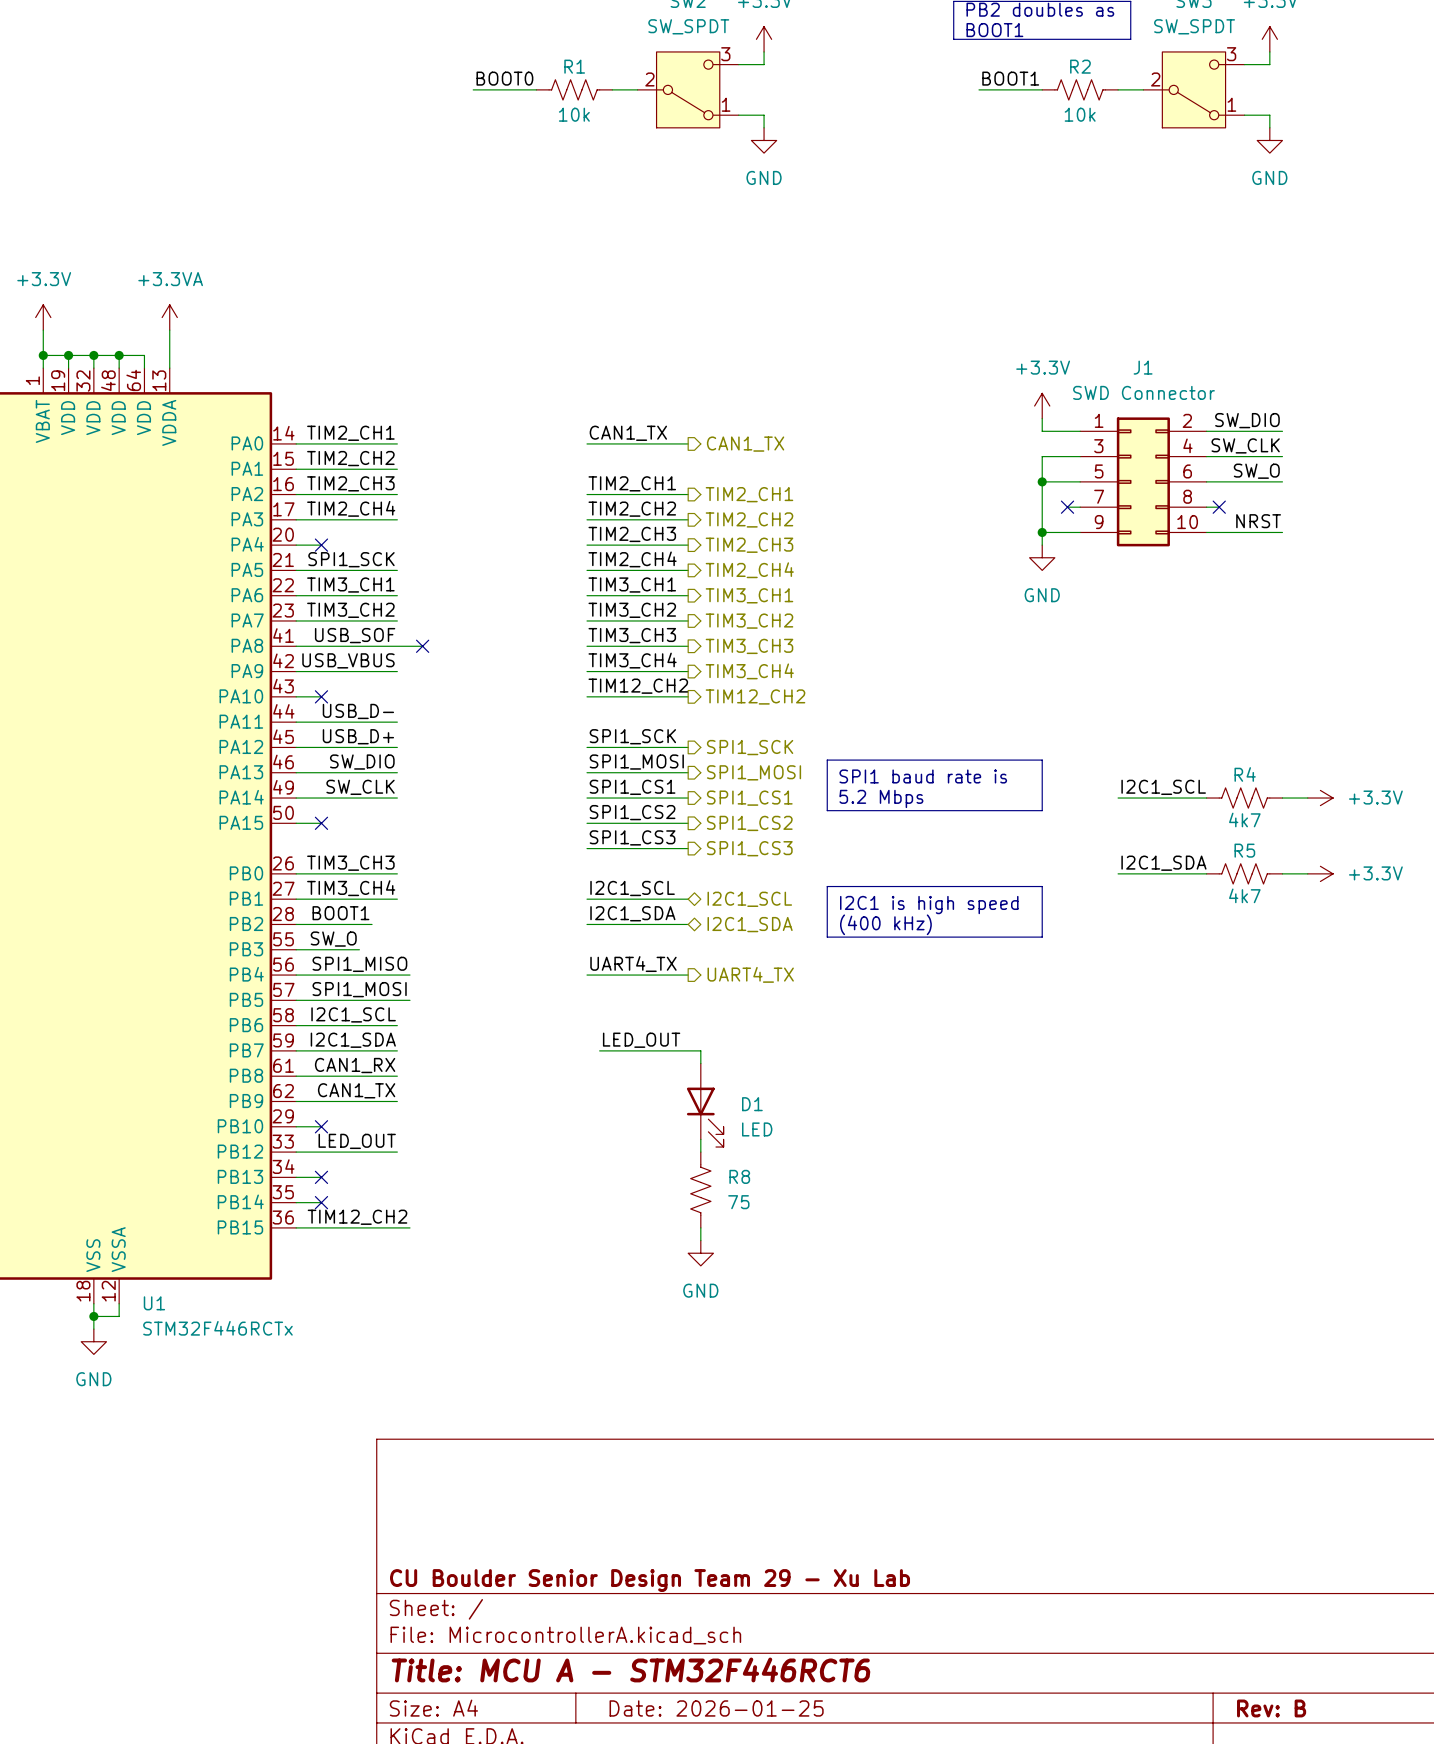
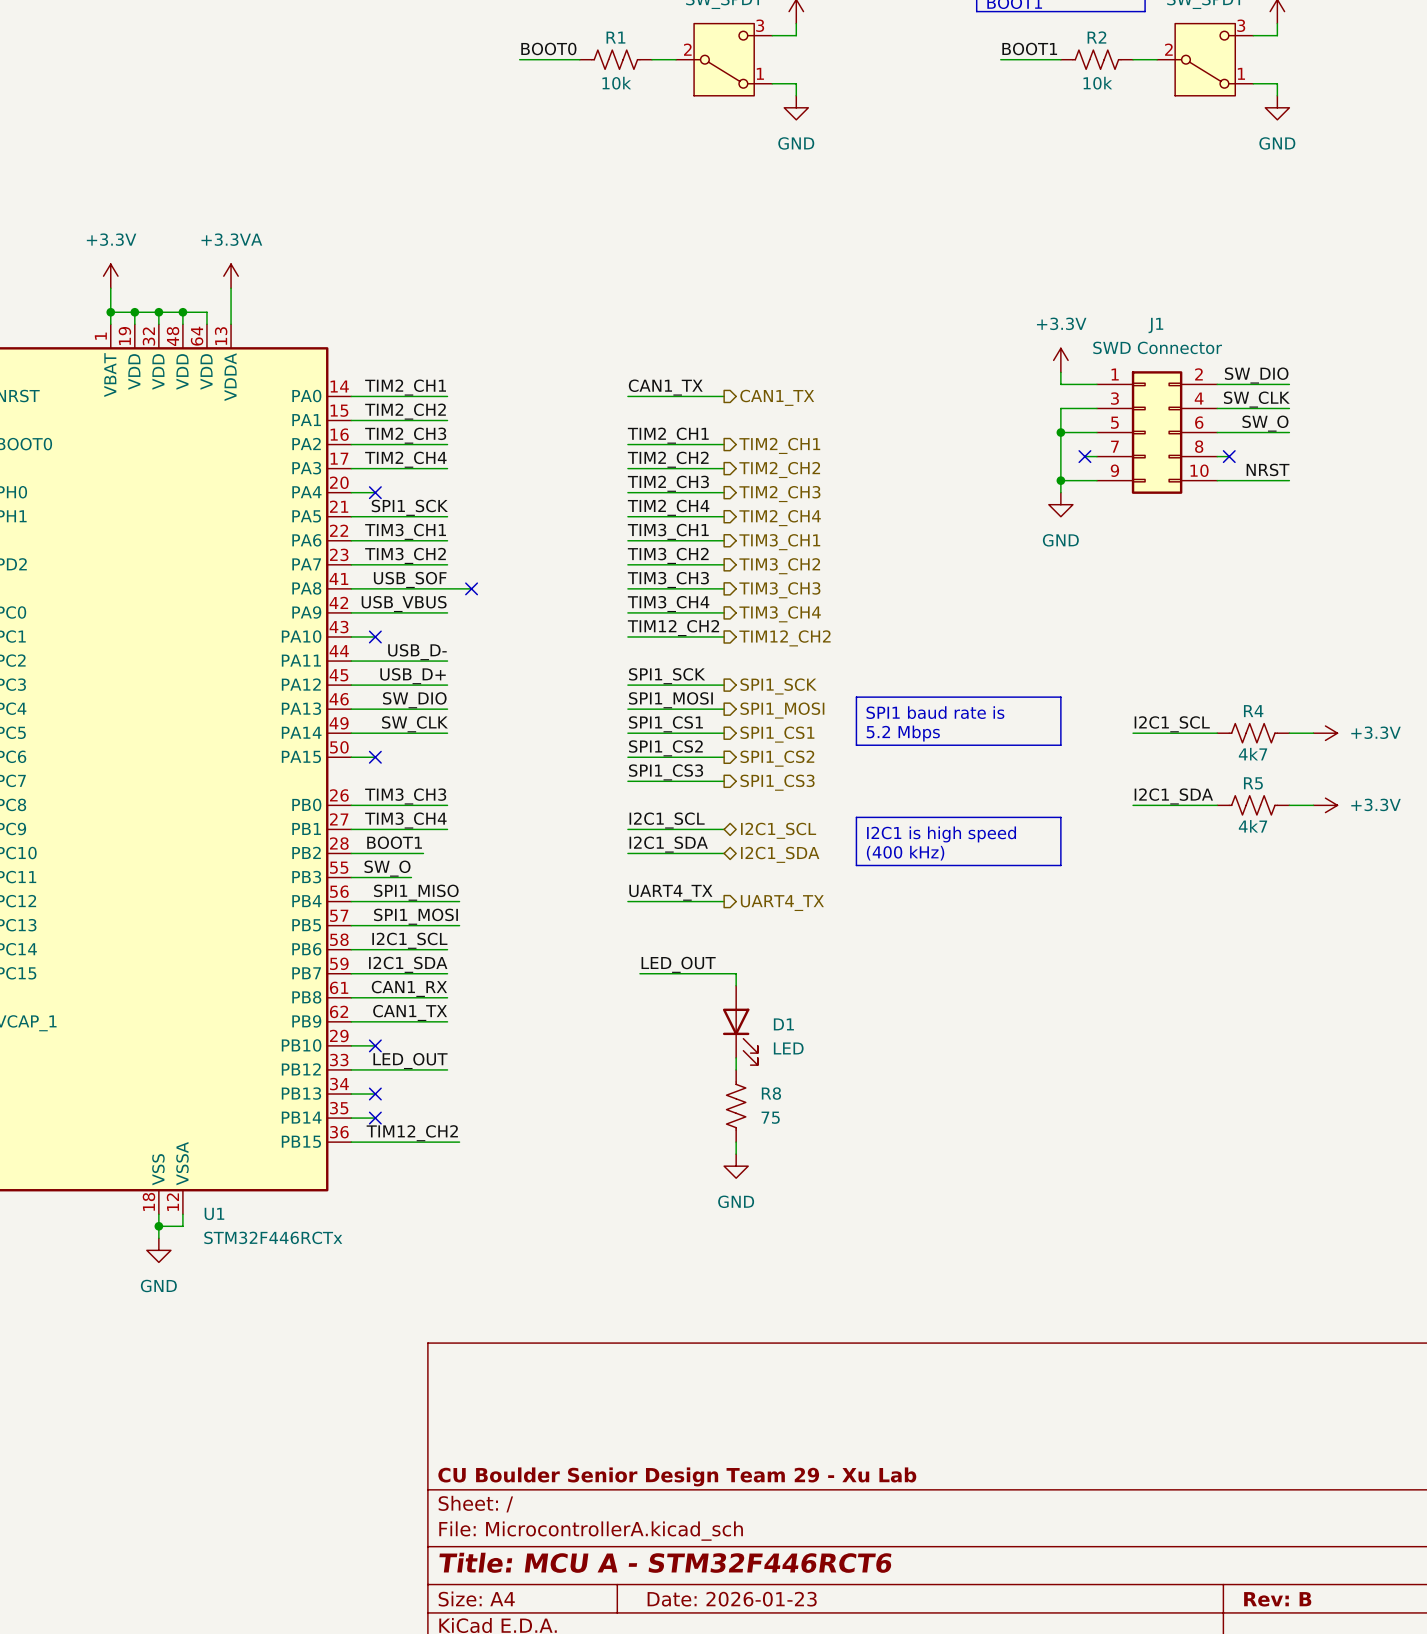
title block: Date: 2026-01-25 (716, 1708) -> Date: 2026-01-23 (732, 1599)

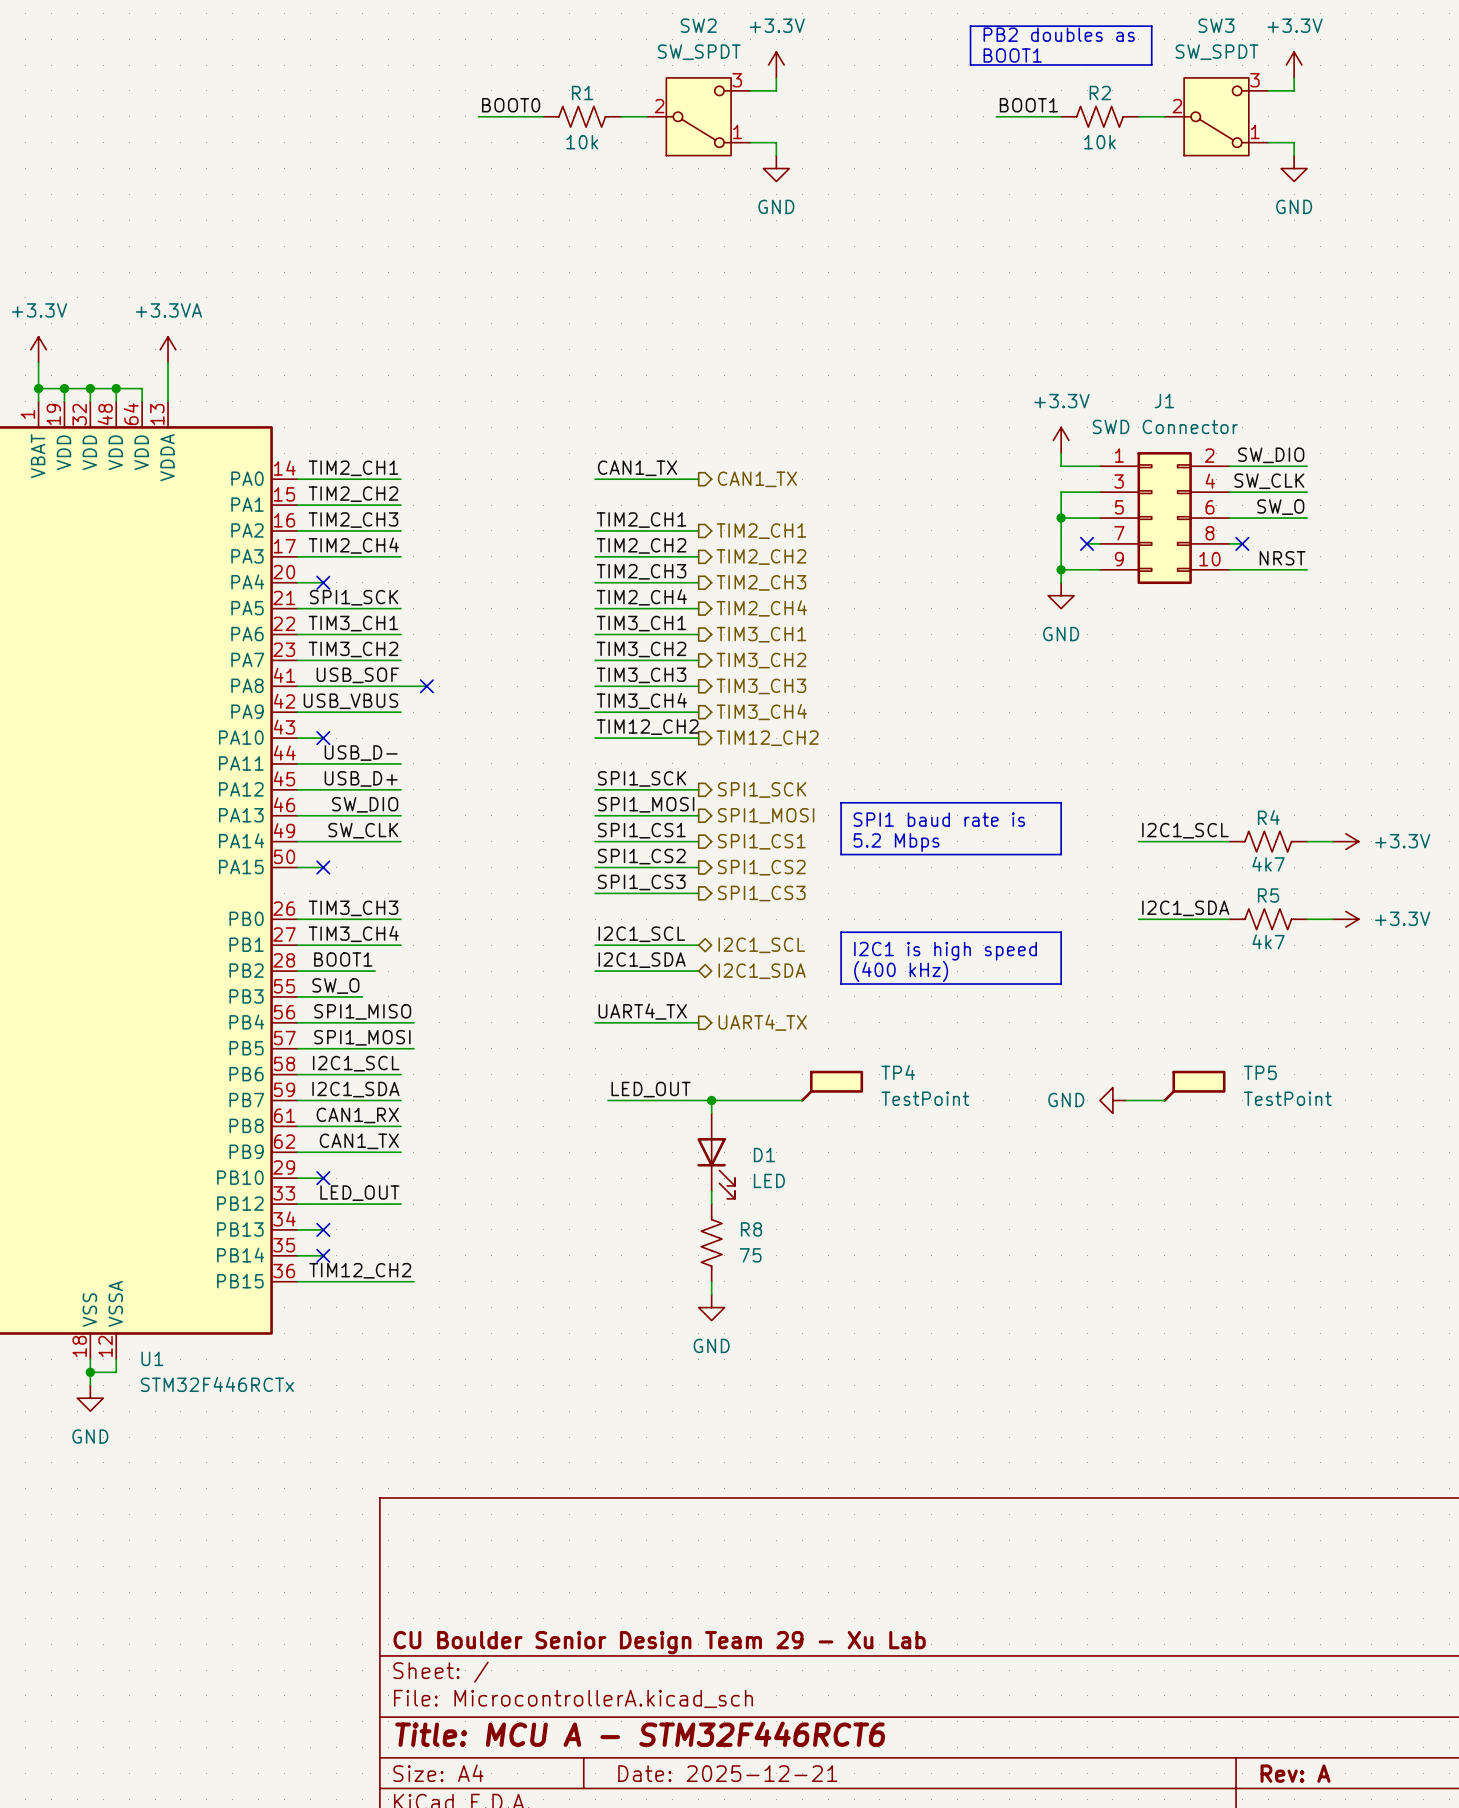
TP4: none -> TestPoint (832, 1086)
TP5: none -> TestPoint (1194, 1086)
wire: none -> (711, 1100) (802, 1100)
junction: none -> (711, 1100)
power symbol: none -> GND (1112, 1100)
wire: none -> (1125, 1100) (1164, 1100)
title block: Date: 2026-01-23 (732, 1599) -> Date: 2025-12-21 (727, 1773)
title block: Rev: B (1277, 1599) -> Rev: A (1295, 1773)

